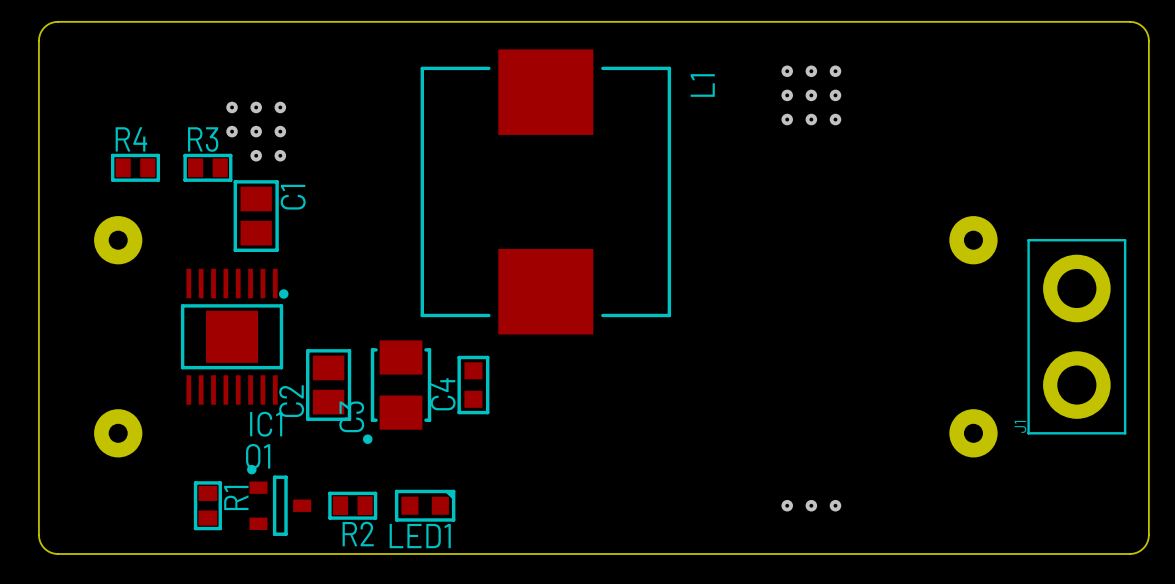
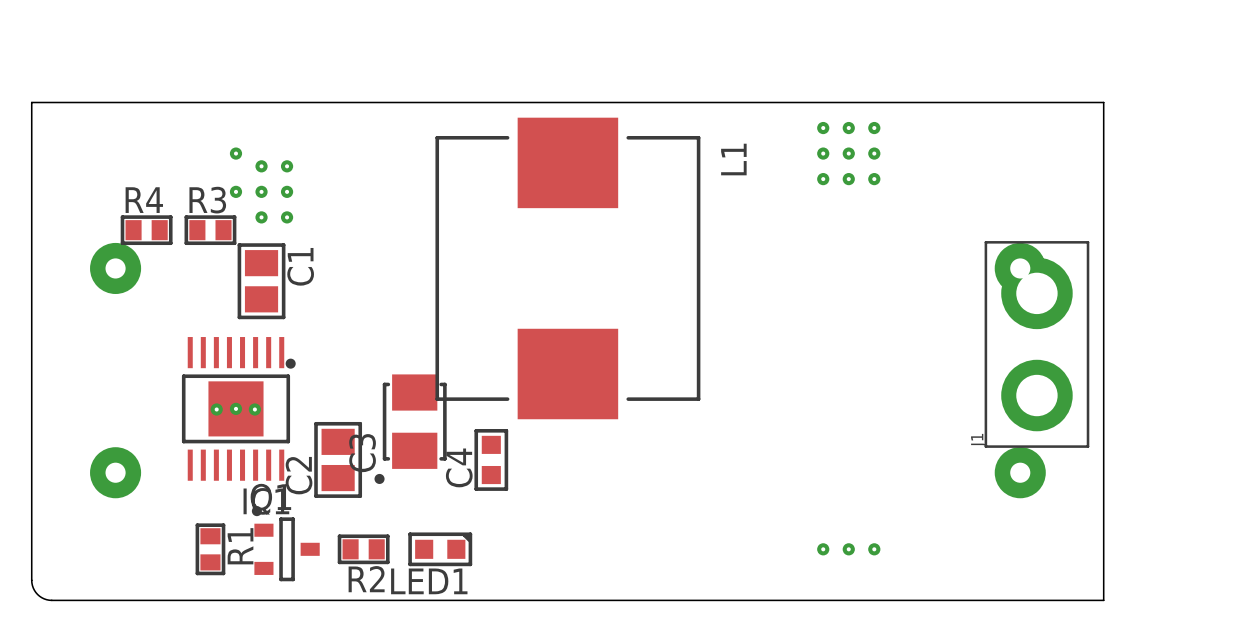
via: (787, 71) -> none
via: (811, 71) -> none
via: (835, 71) -> none
board edge: (38, 83) (39, 35) (46, 25) (57, 21) (1137, 23) (1144, 29) (1148, 40) (1148, 537) (1143, 548) (1132, 553) (1052, 554) -> (31, 102) (1103, 102) (1103, 600)
via: (787, 95) -> none
via: (811, 95) -> none
via: (835, 95) -> none
via: (232, 107) -> none
via: (256, 107) -> none
via: (280, 107) -> none
via: none -> (823, 128)
via: none -> (848, 128)
via: none -> (874, 128)
via: (787, 119) -> none
via: (811, 119) -> none
via: (835, 119) -> none
via: (256, 131) -> none
via: (280, 131) -> none
via: none -> (823, 153)
via: none -> (848, 153)
via: none -> (874, 153)
via: none -> (261, 166)
via: none -> (287, 166)
via: (256, 155) -> none
via: (280, 155) -> none
via: none -> (823, 179)
via: none -> (848, 179)
via: none -> (874, 179)
R4 position: (135, 167) -> (146, 230)
R3 position: (207, 167) -> (210, 230)
via: none -> (235, 191)
via: none -> (261, 191)
via: none -> (287, 191)
via: none -> (261, 217)
via: none -> (287, 217)
L1 position: (545, 191) -> (567, 268)
C1 position: (256, 216) -> (261, 281)
IC1 position: (234, 336) -> (238, 408)
J1 position: (1076, 336) -> (1036, 344)
via: none -> (235, 408)
via: none -> (216, 409)
via: none -> (254, 409)
C2 position: (328, 385) -> (338, 459)
C4 position: (473, 385) -> (491, 459)

